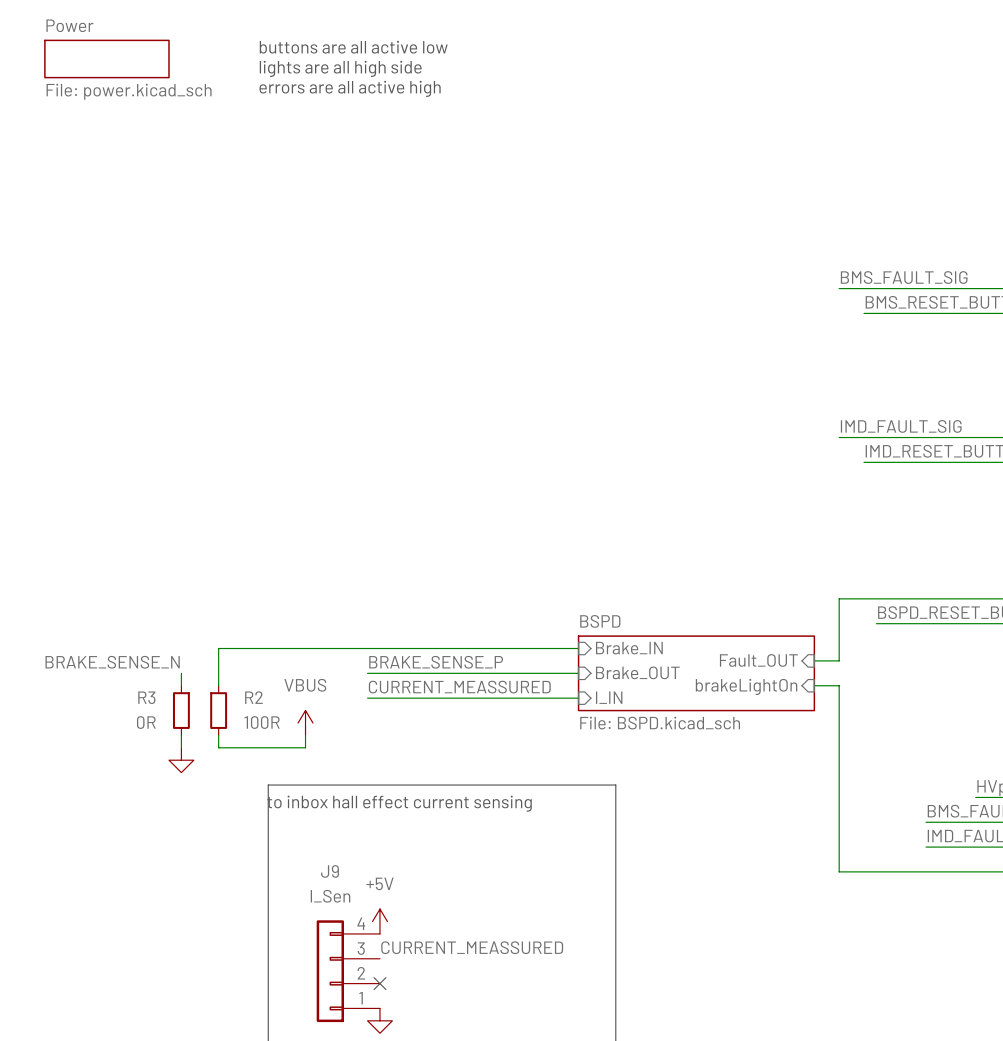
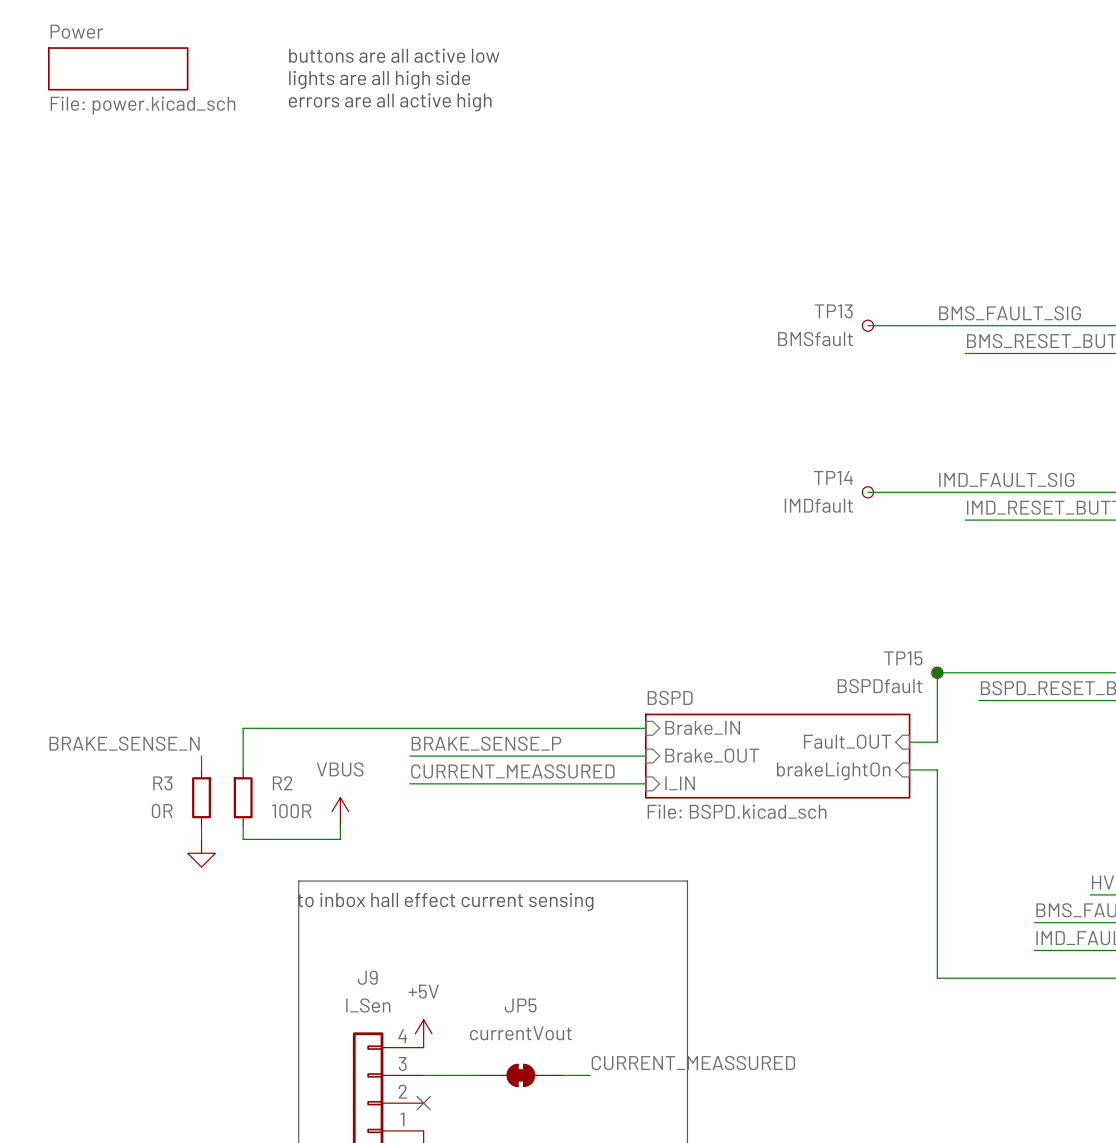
wire: none -> (867, 325) (937, 325)
TP13: none -> BMSfault (867, 325)
wire: none -> (867, 492) (937, 492)
TP14: none -> IMDfault (867, 492)
junction: none -> (937, 672)
TP15: none -> BSPDfault (937, 672)
label position: CURRENT_MEASSURED (472, 947) -> CURRENT_MEASSURED (693, 1063)
wire: none -> (423, 1075) (479, 1075)
JP5: none -> currentVout (520, 1075)
wire: none -> (562, 1075) (590, 1075)

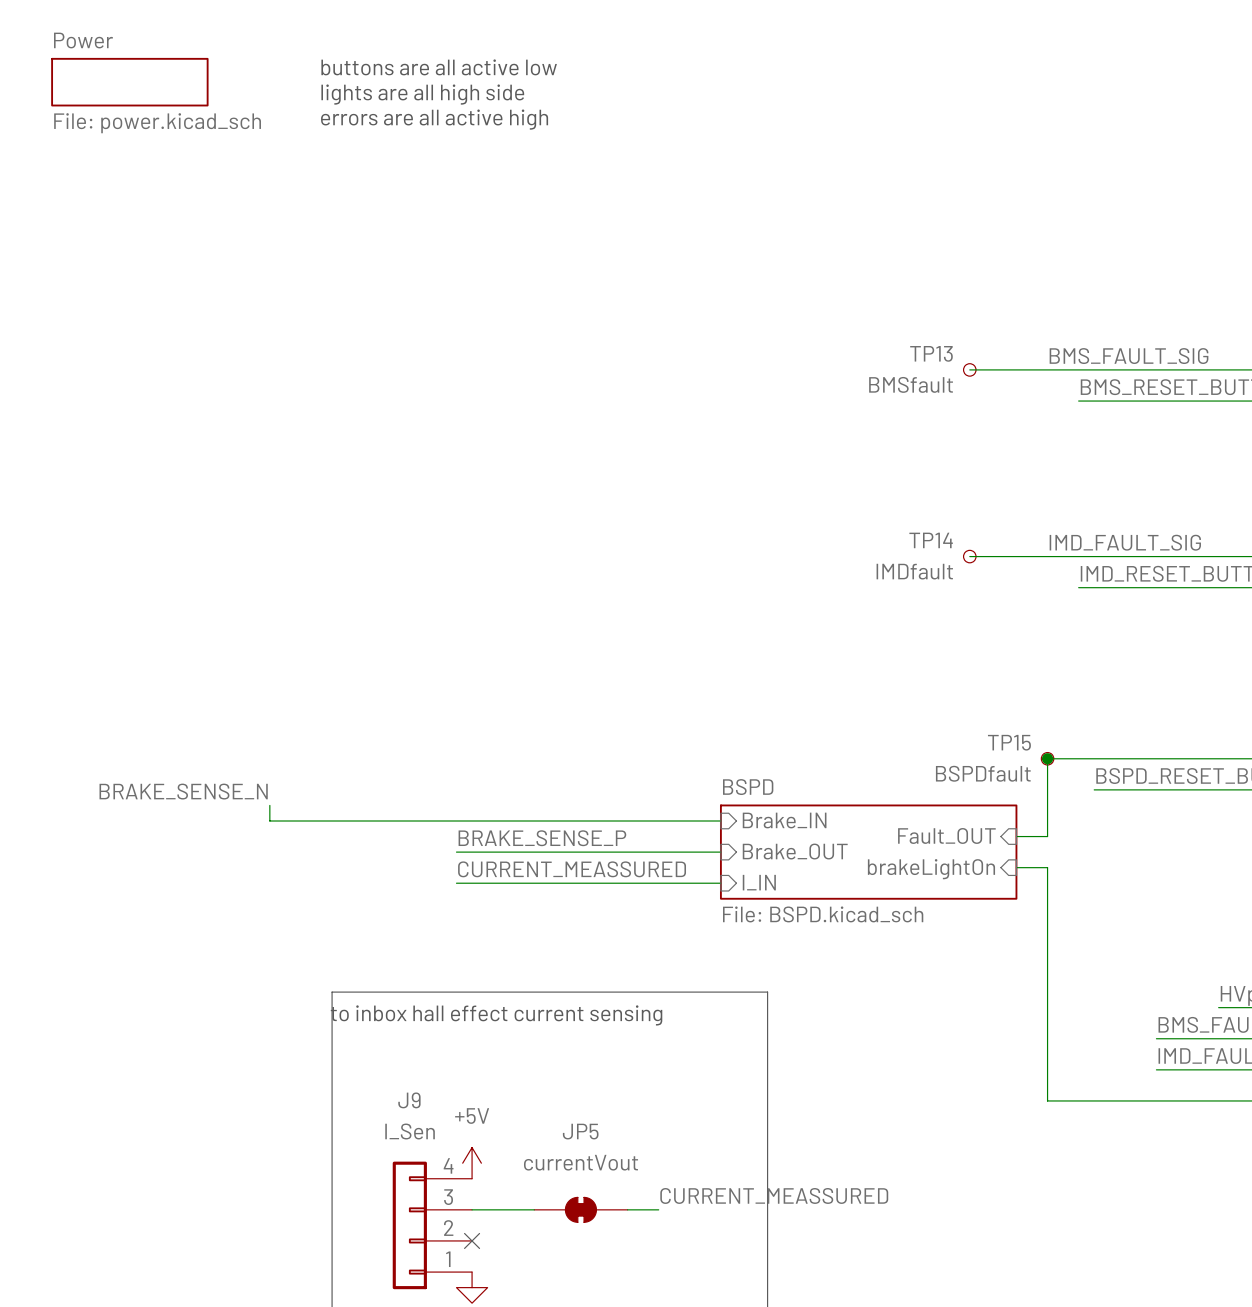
wire: (243, 728) (243, 769) -> (269, 821) (269, 805)
label position: BRAKE_SENSE_N (124, 743) -> BRAKE_SENSE_N (183, 791)
wire: (201, 756) (201, 769) -> none
R3: 0R (201, 797) -> none
R2: 100R (243, 797) -> none
power symbol: VBUS (340, 811) -> none
wire: (201, 825) (201, 839) -> none
wire: (243, 825) (243, 839) (340, 839) (340, 825) -> none
power symbol: (201, 853) -> none

